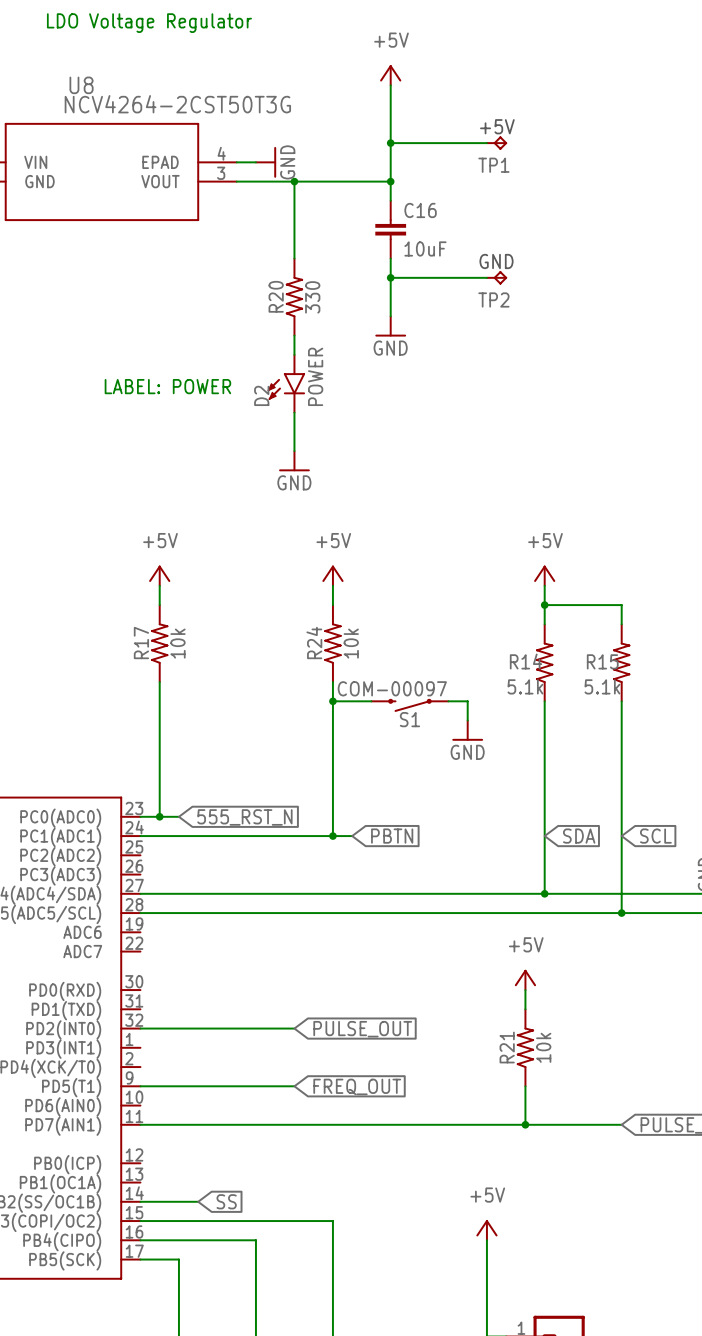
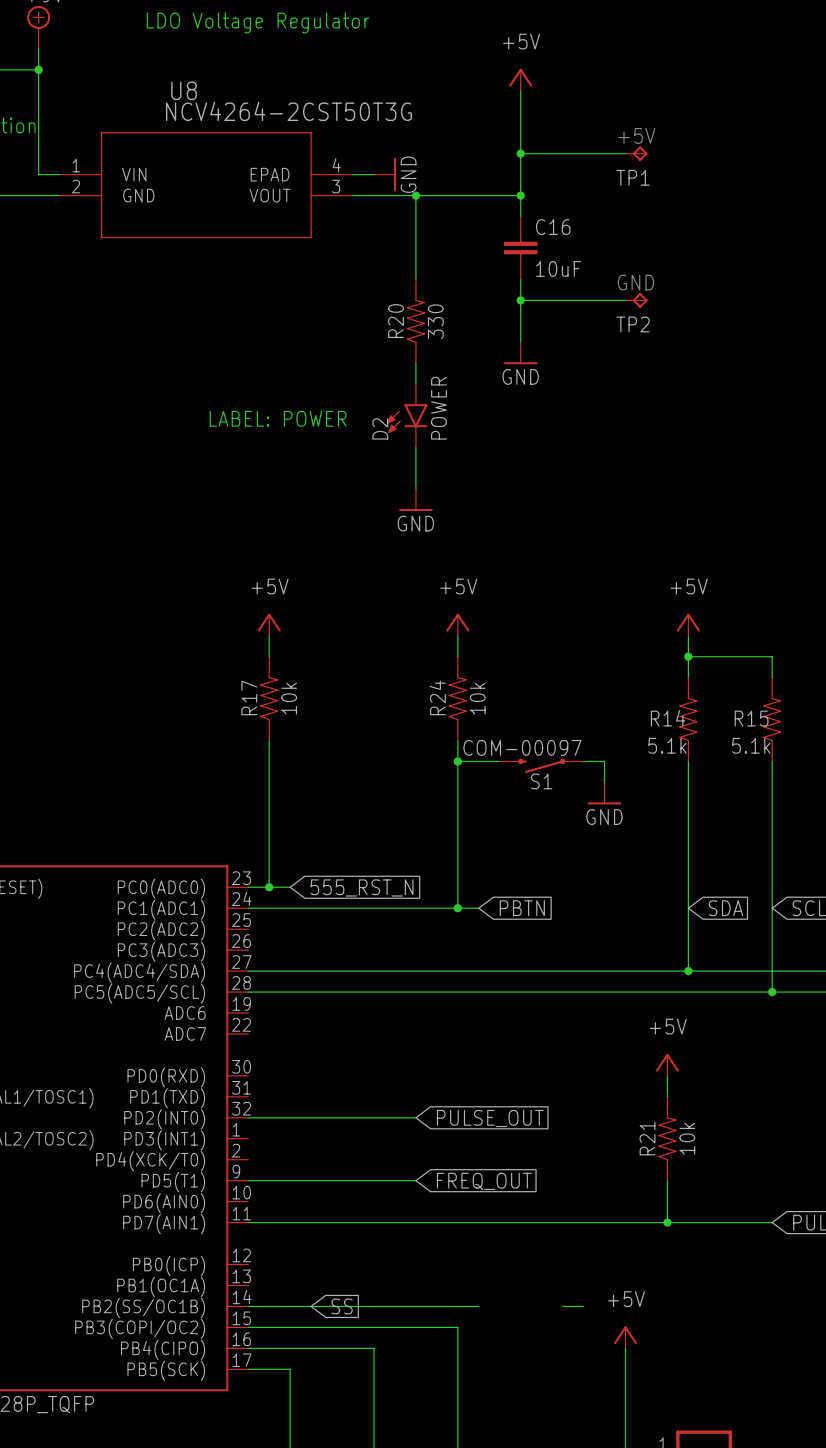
wire: none -> (311, 1306) (478, 1306)
wire: none -> (562, 1306) (583, 1306)

